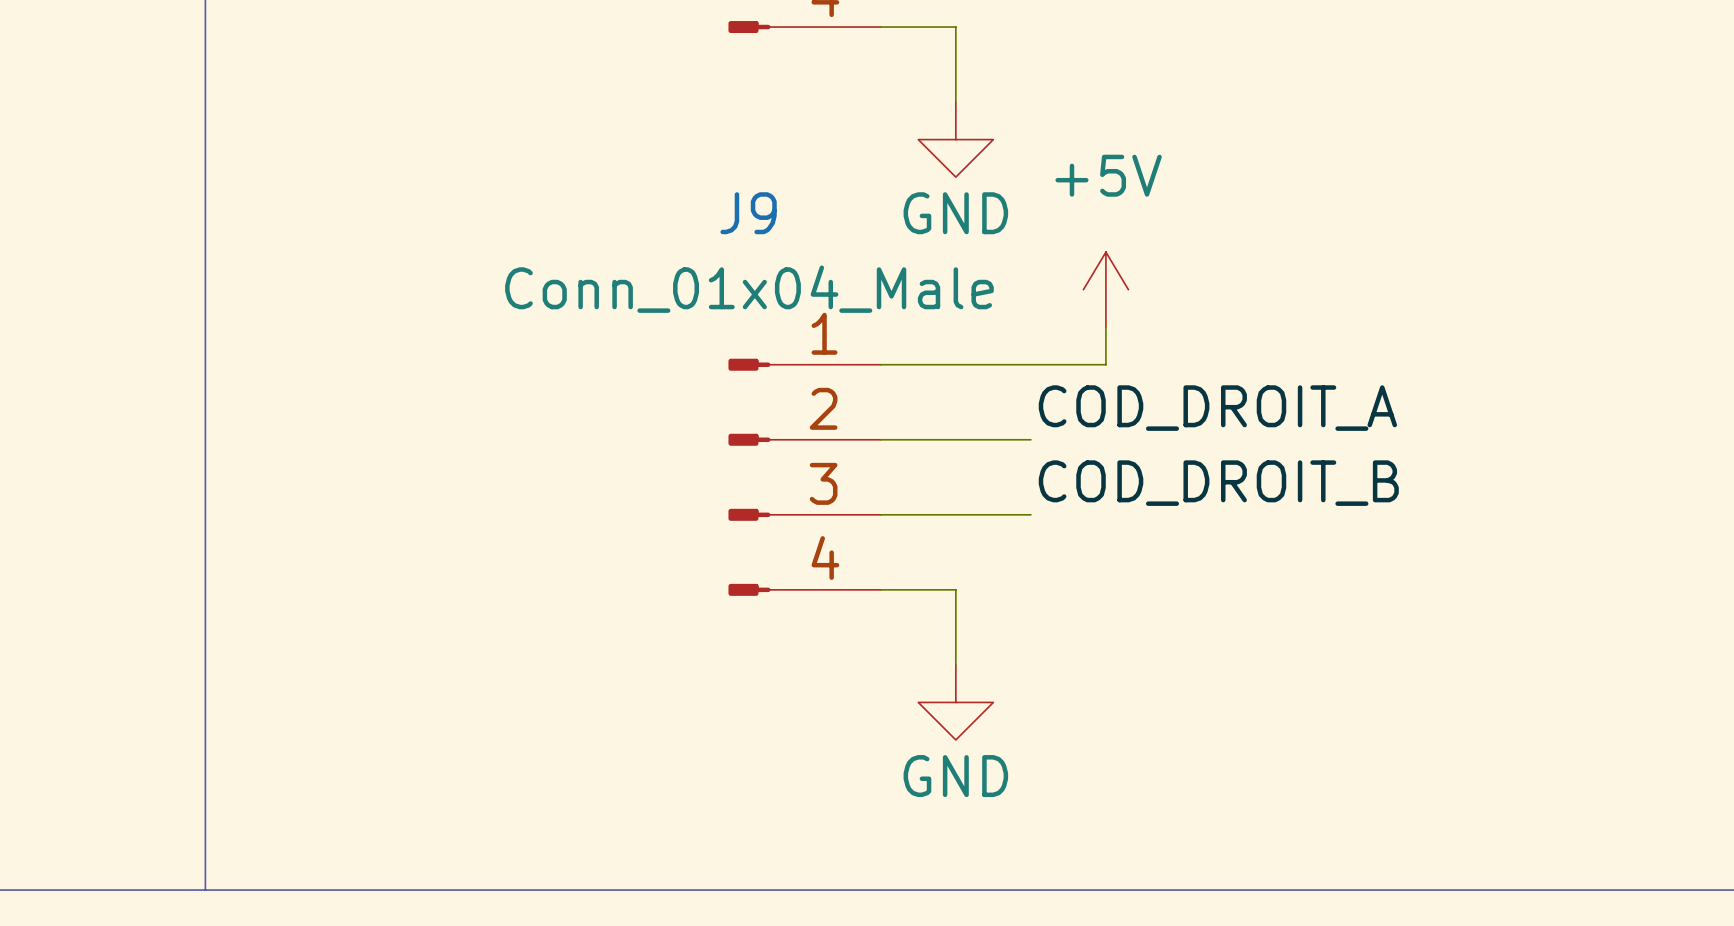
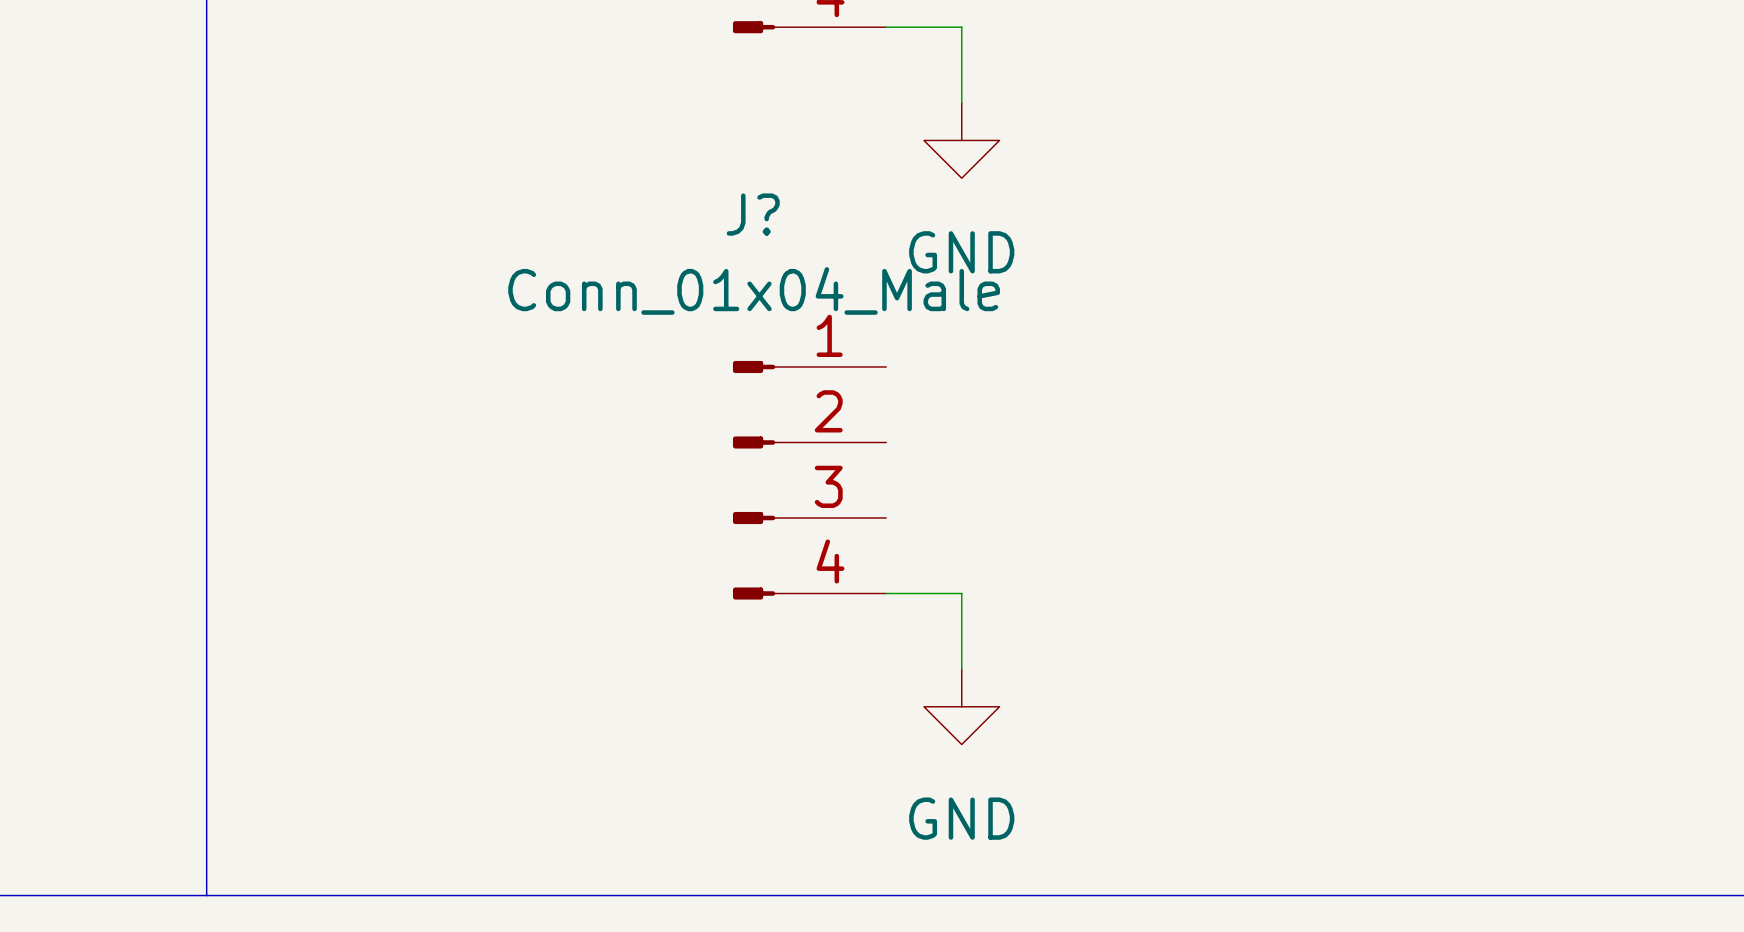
J9 name: J9 (748, 213) -> J? (753, 214)
power symbol text position: GND (955, 213) -> GND (961, 252)
power symbol: +5V (1105, 289) -> none
wire: (1105, 327) (1105, 364) (880, 364) -> none
label: COD_DROIT_A (1217, 408) -> none
wire: (880, 439) (1030, 439) -> none
label: COD_DROIT_B (1218, 483) -> none
wire: (880, 514) (1030, 514) -> none
power symbol text position: GND (955, 776) -> GND (961, 818)

